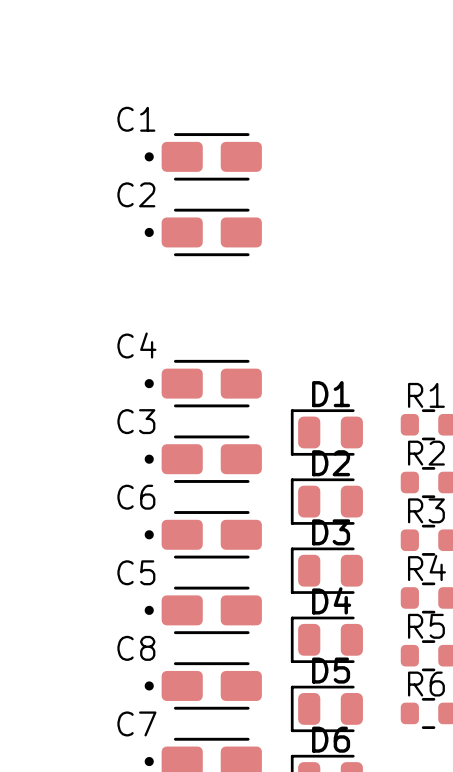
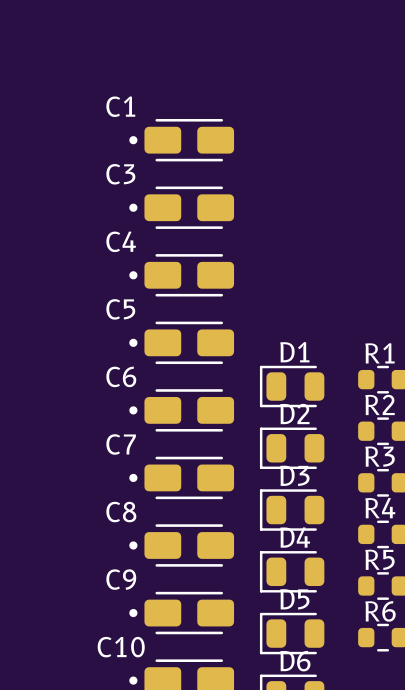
C2 name: C2 (136, 194) -> C3 (120, 174)
C4: none -> (181, 275)
C4 name: C4 (136, 345) -> C5 (120, 309)
C3 name: C3 (136, 421) -> C6 (121, 376)
C6 name: C6 (136, 497) -> C7 (121, 444)
C5 name: C5 (136, 572) -> C8 (121, 512)
C8 name: C8 (136, 648) -> C9 (121, 579)
C7 name: C7 (136, 723) -> C10 (121, 647)

